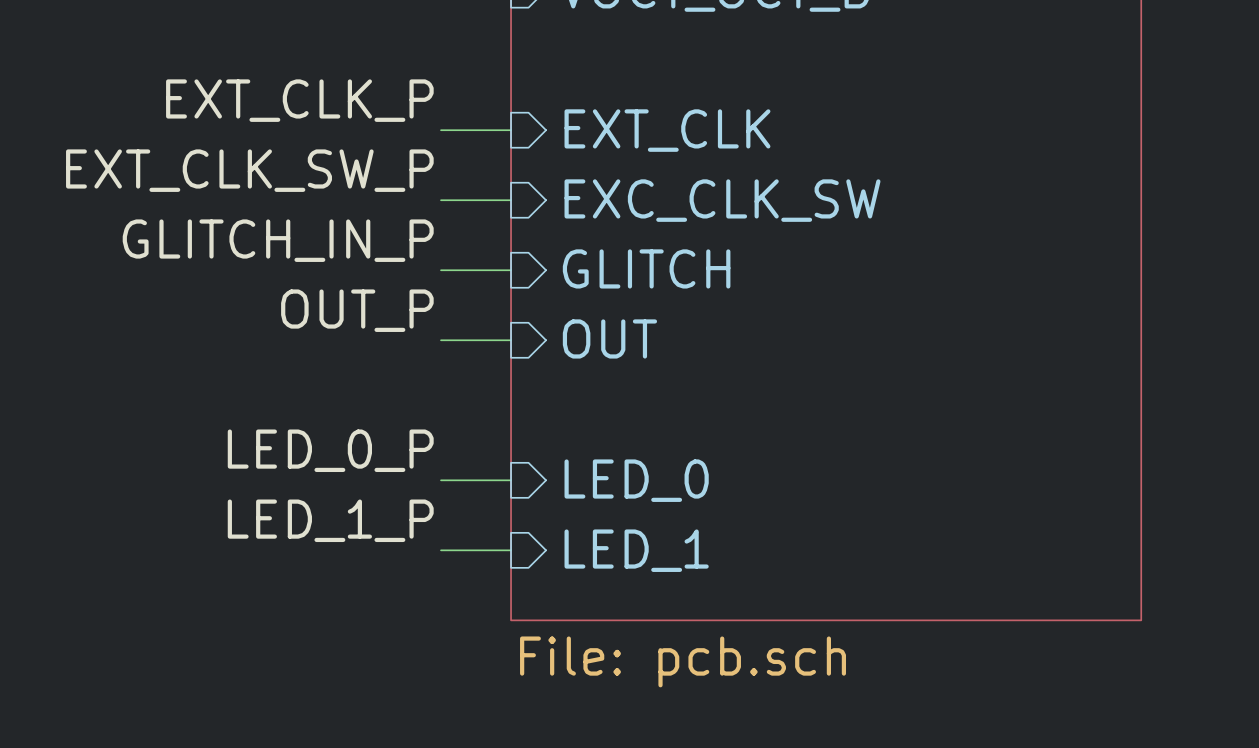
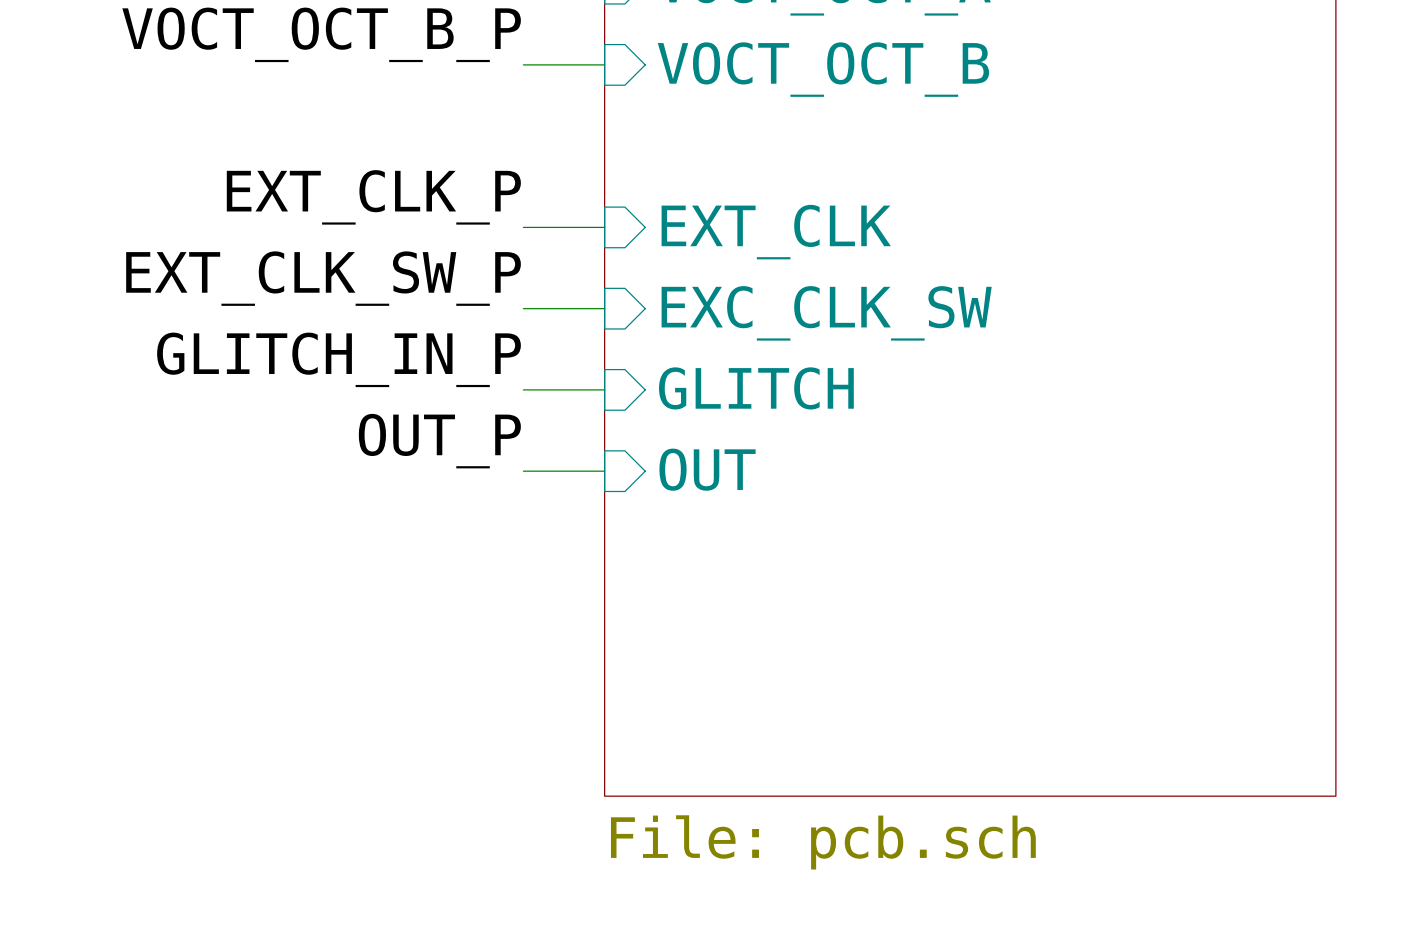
label: LED_0_P (330, 450) -> none
wire: (441, 480) (511, 480) -> none
sheet pin: LED_0 (636, 480) -> none
label: LED_1_P (330, 520) -> none
wire: (441, 550) (511, 550) -> none
sheet pin: LED_1 (636, 550) -> none

